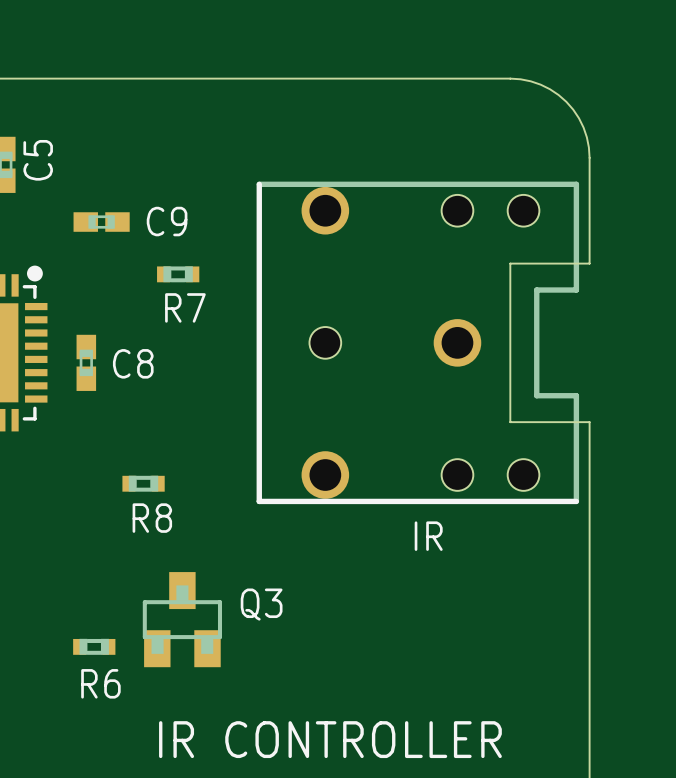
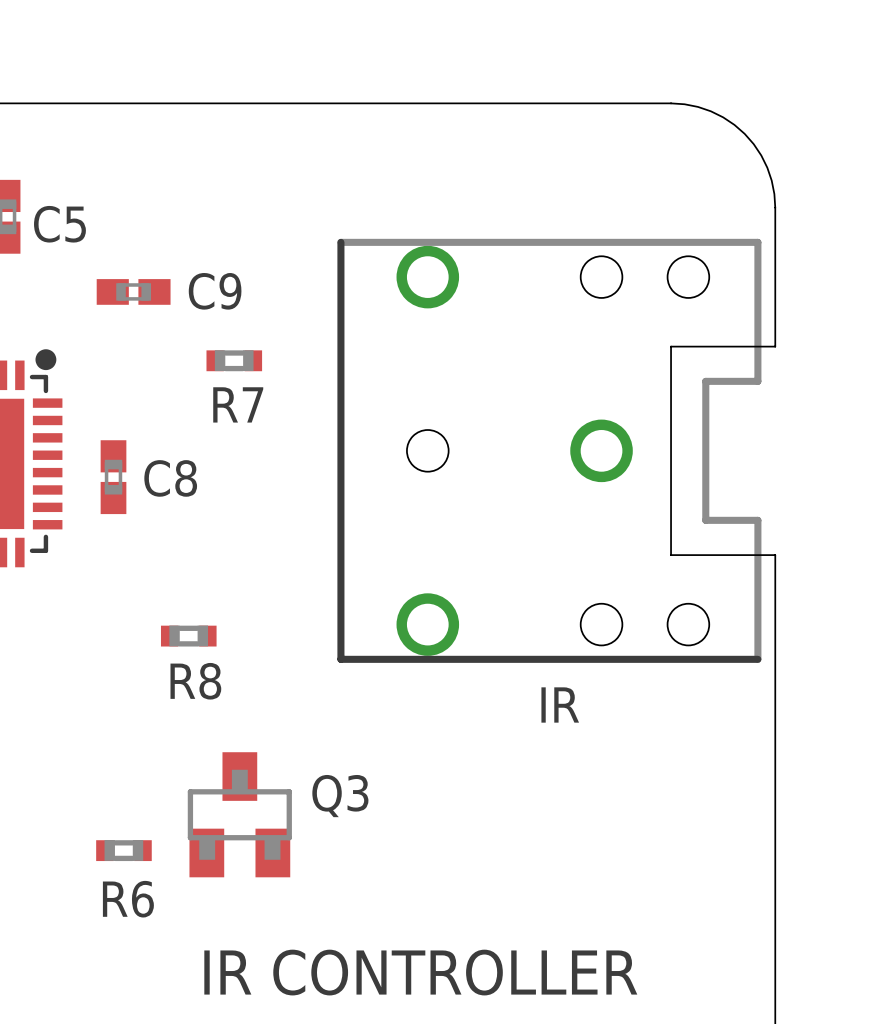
C5 name rotation: 0° (38, 160) -> 90° clockwise (59, 224)

